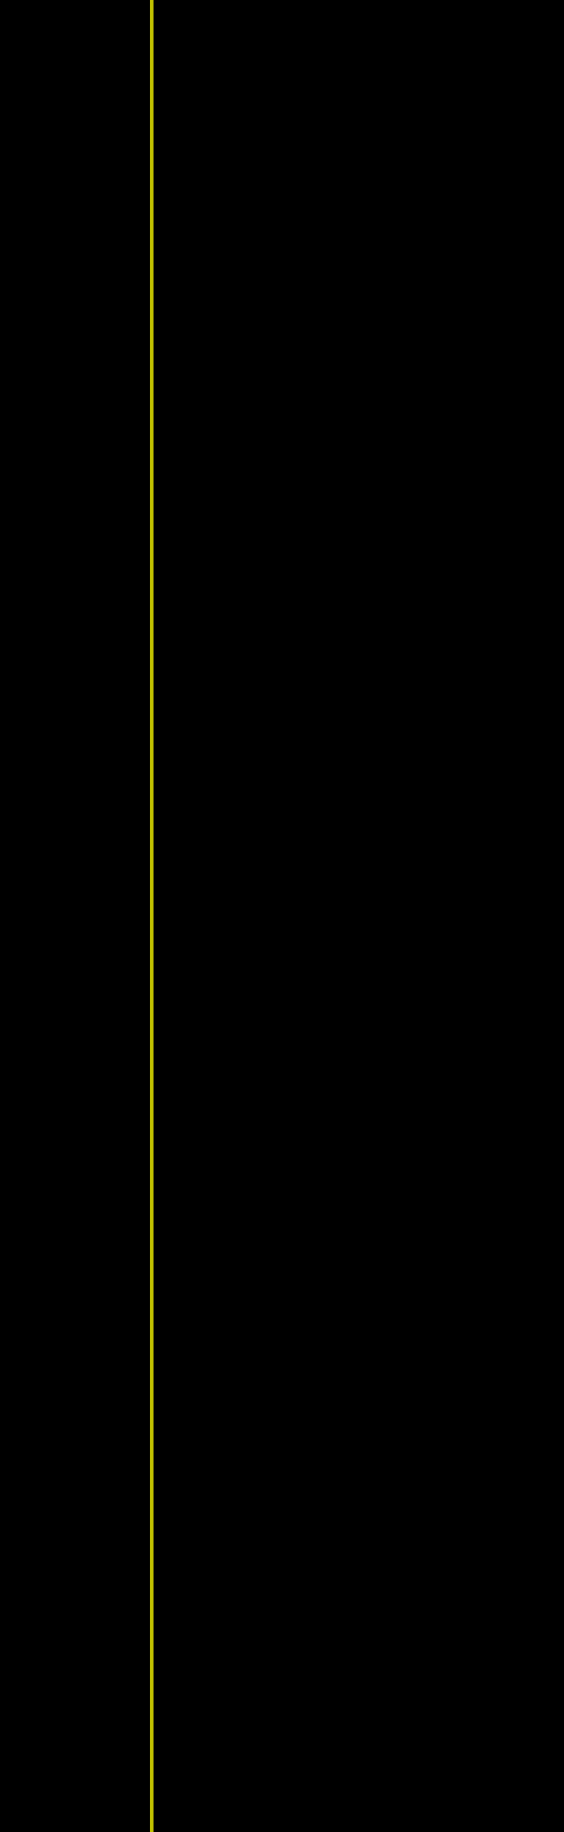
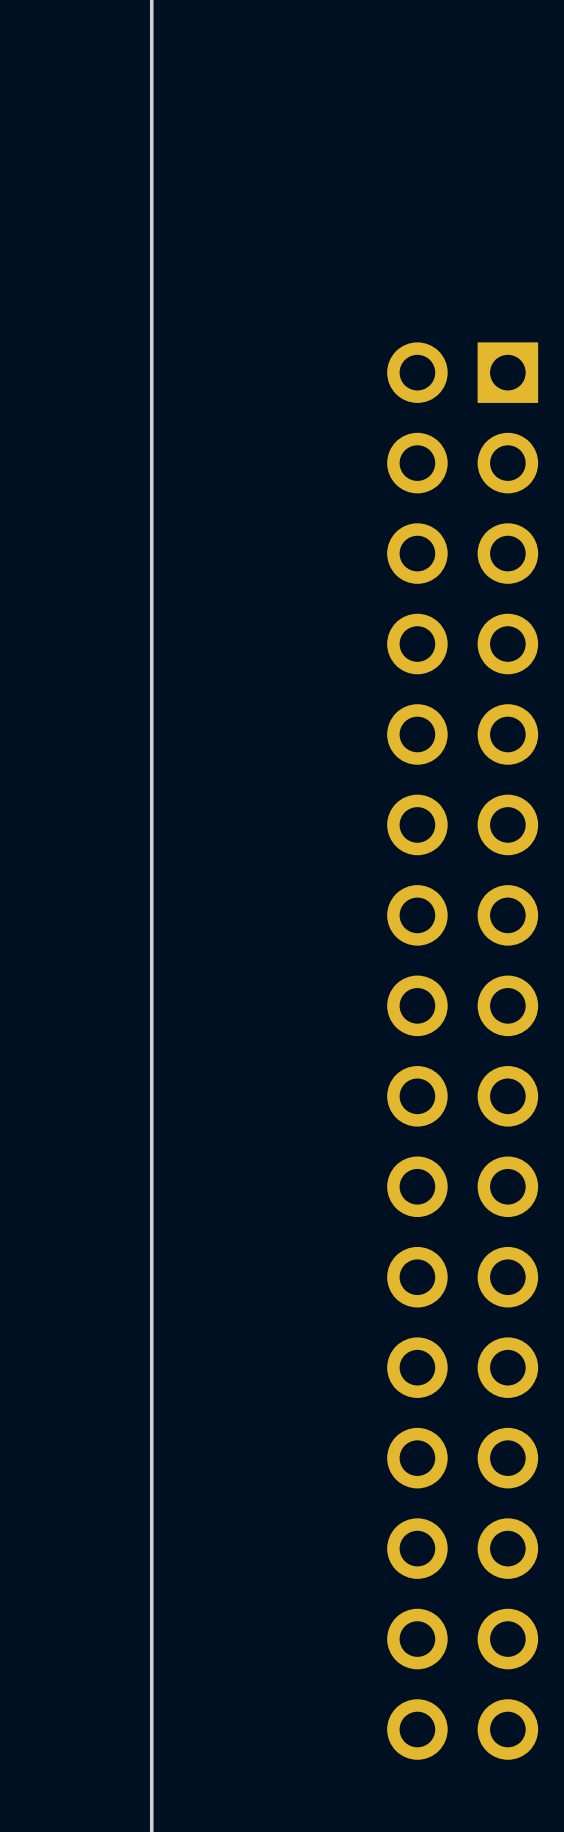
part: none -> (462, 1051)

